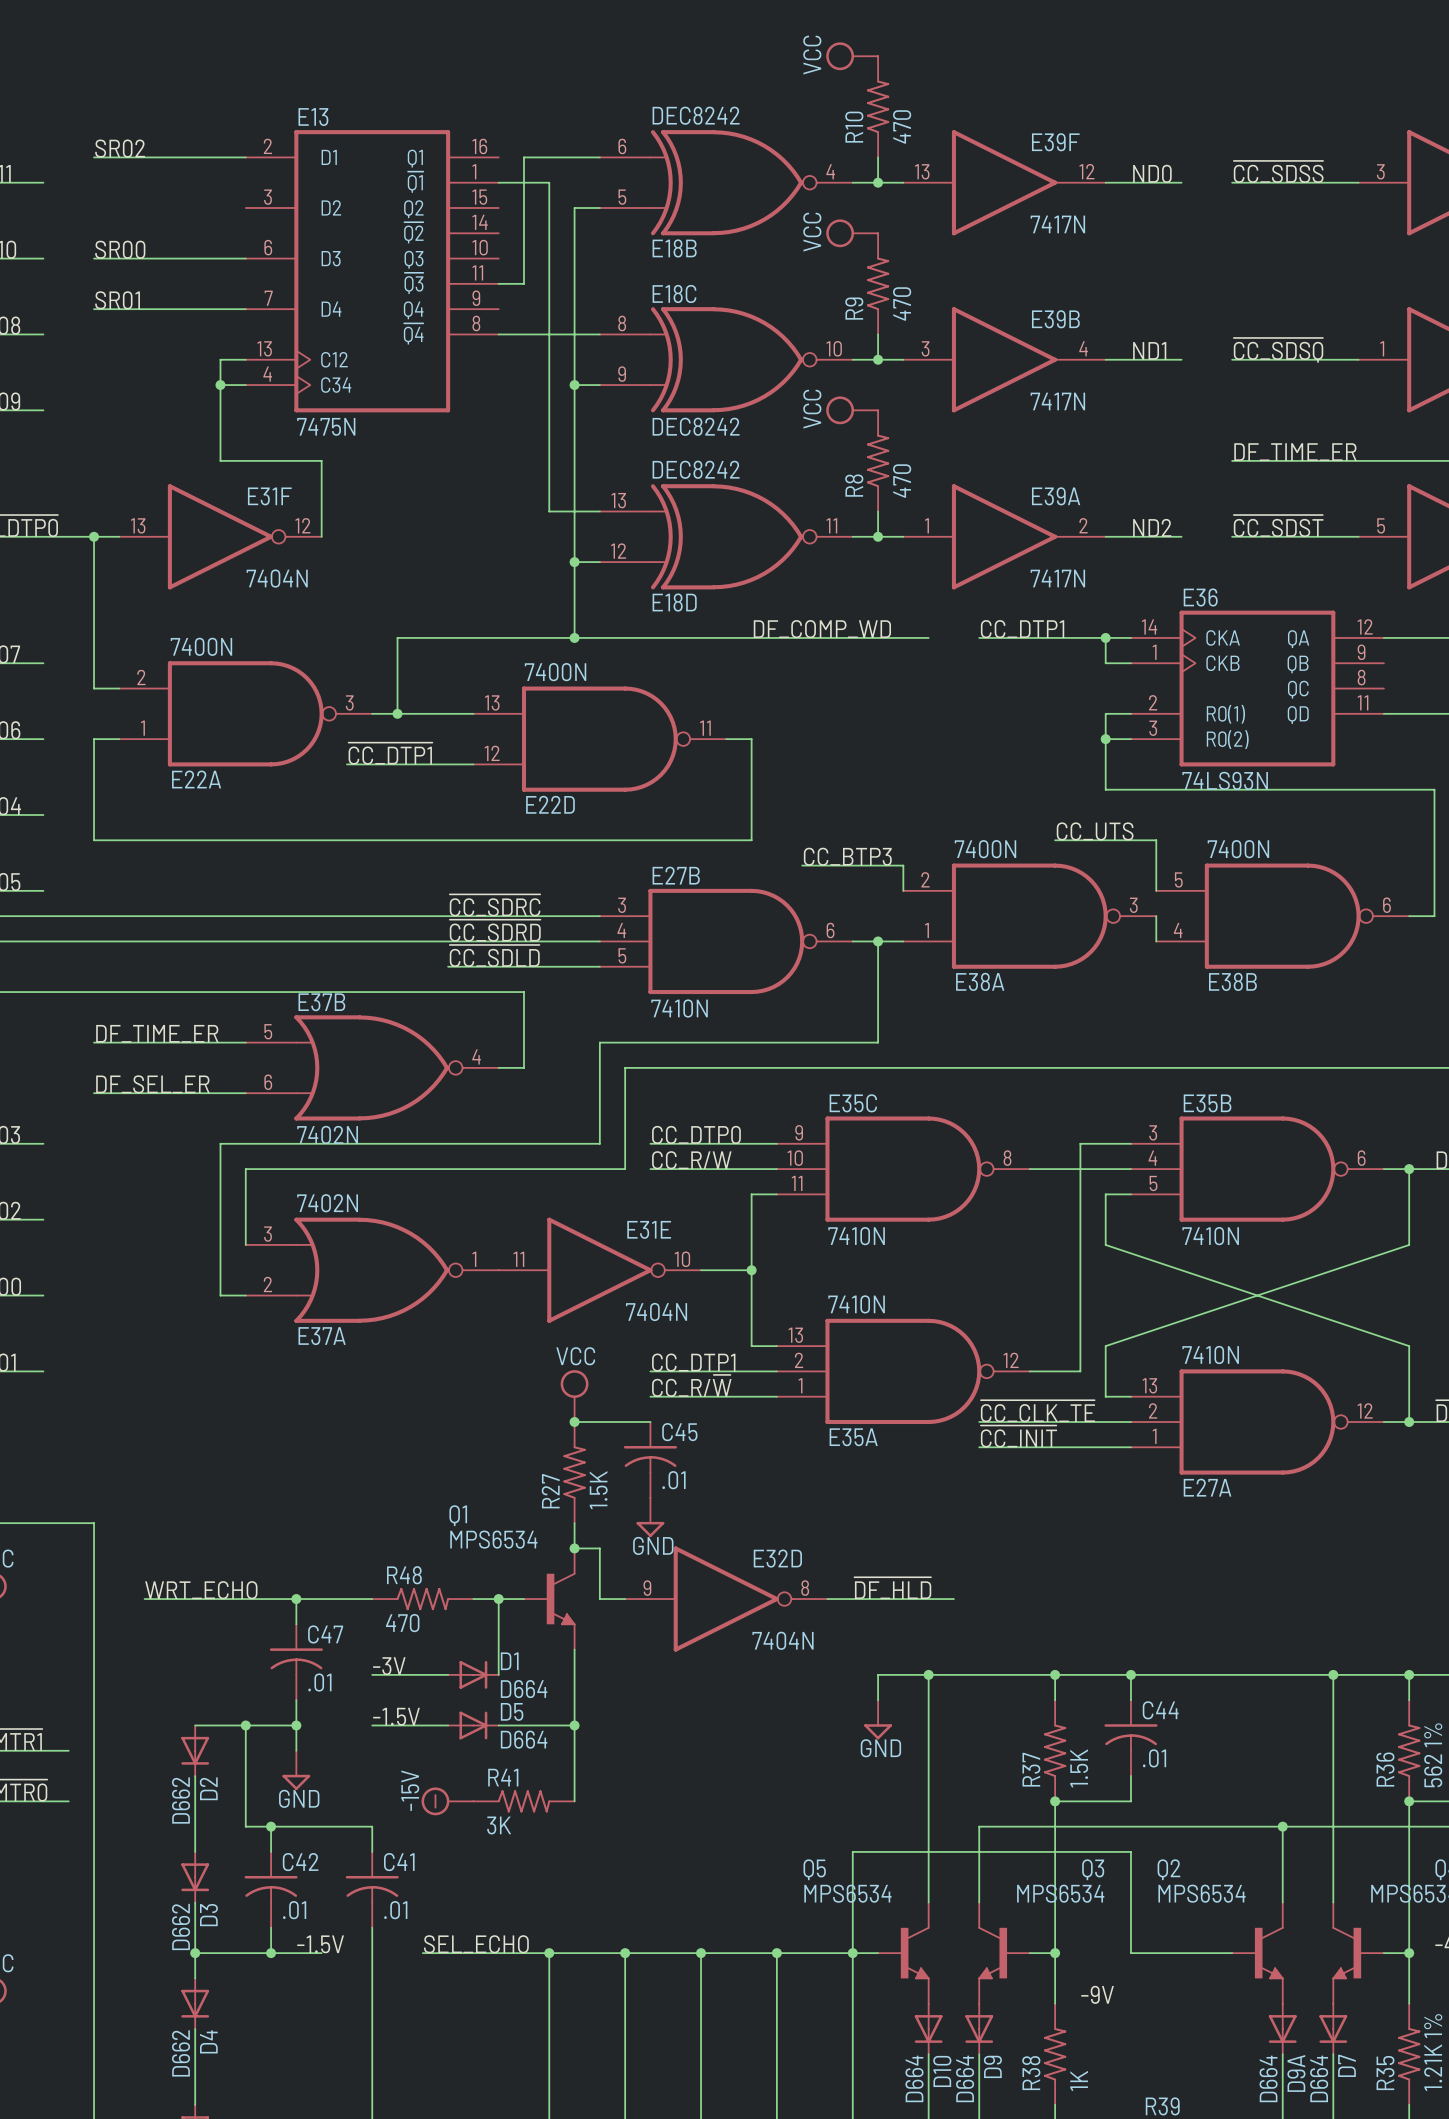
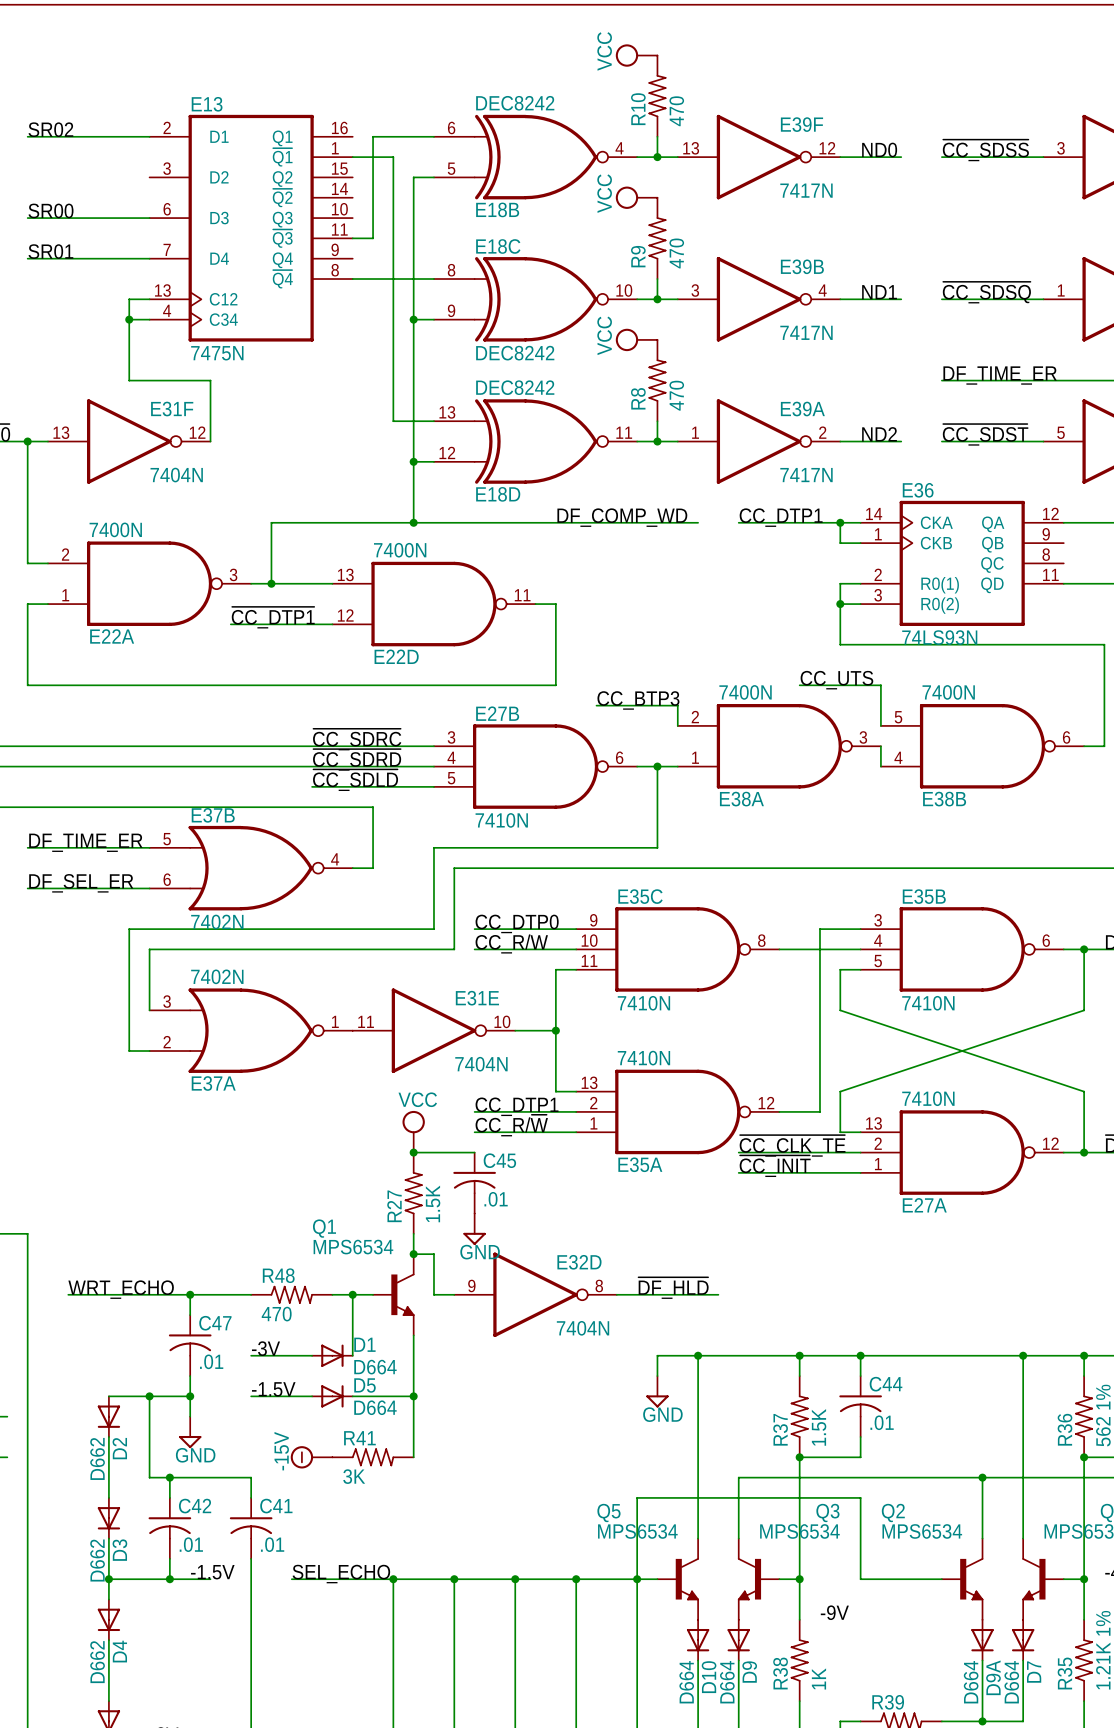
E39F symbol: [903, 130, 1106, 236] -> [677, 114, 841, 200]
E39B symbol: [903, 307, 1106, 413] -> [677, 257, 841, 342]
E39A symbol: [903, 484, 1106, 590] -> [677, 399, 841, 484]

